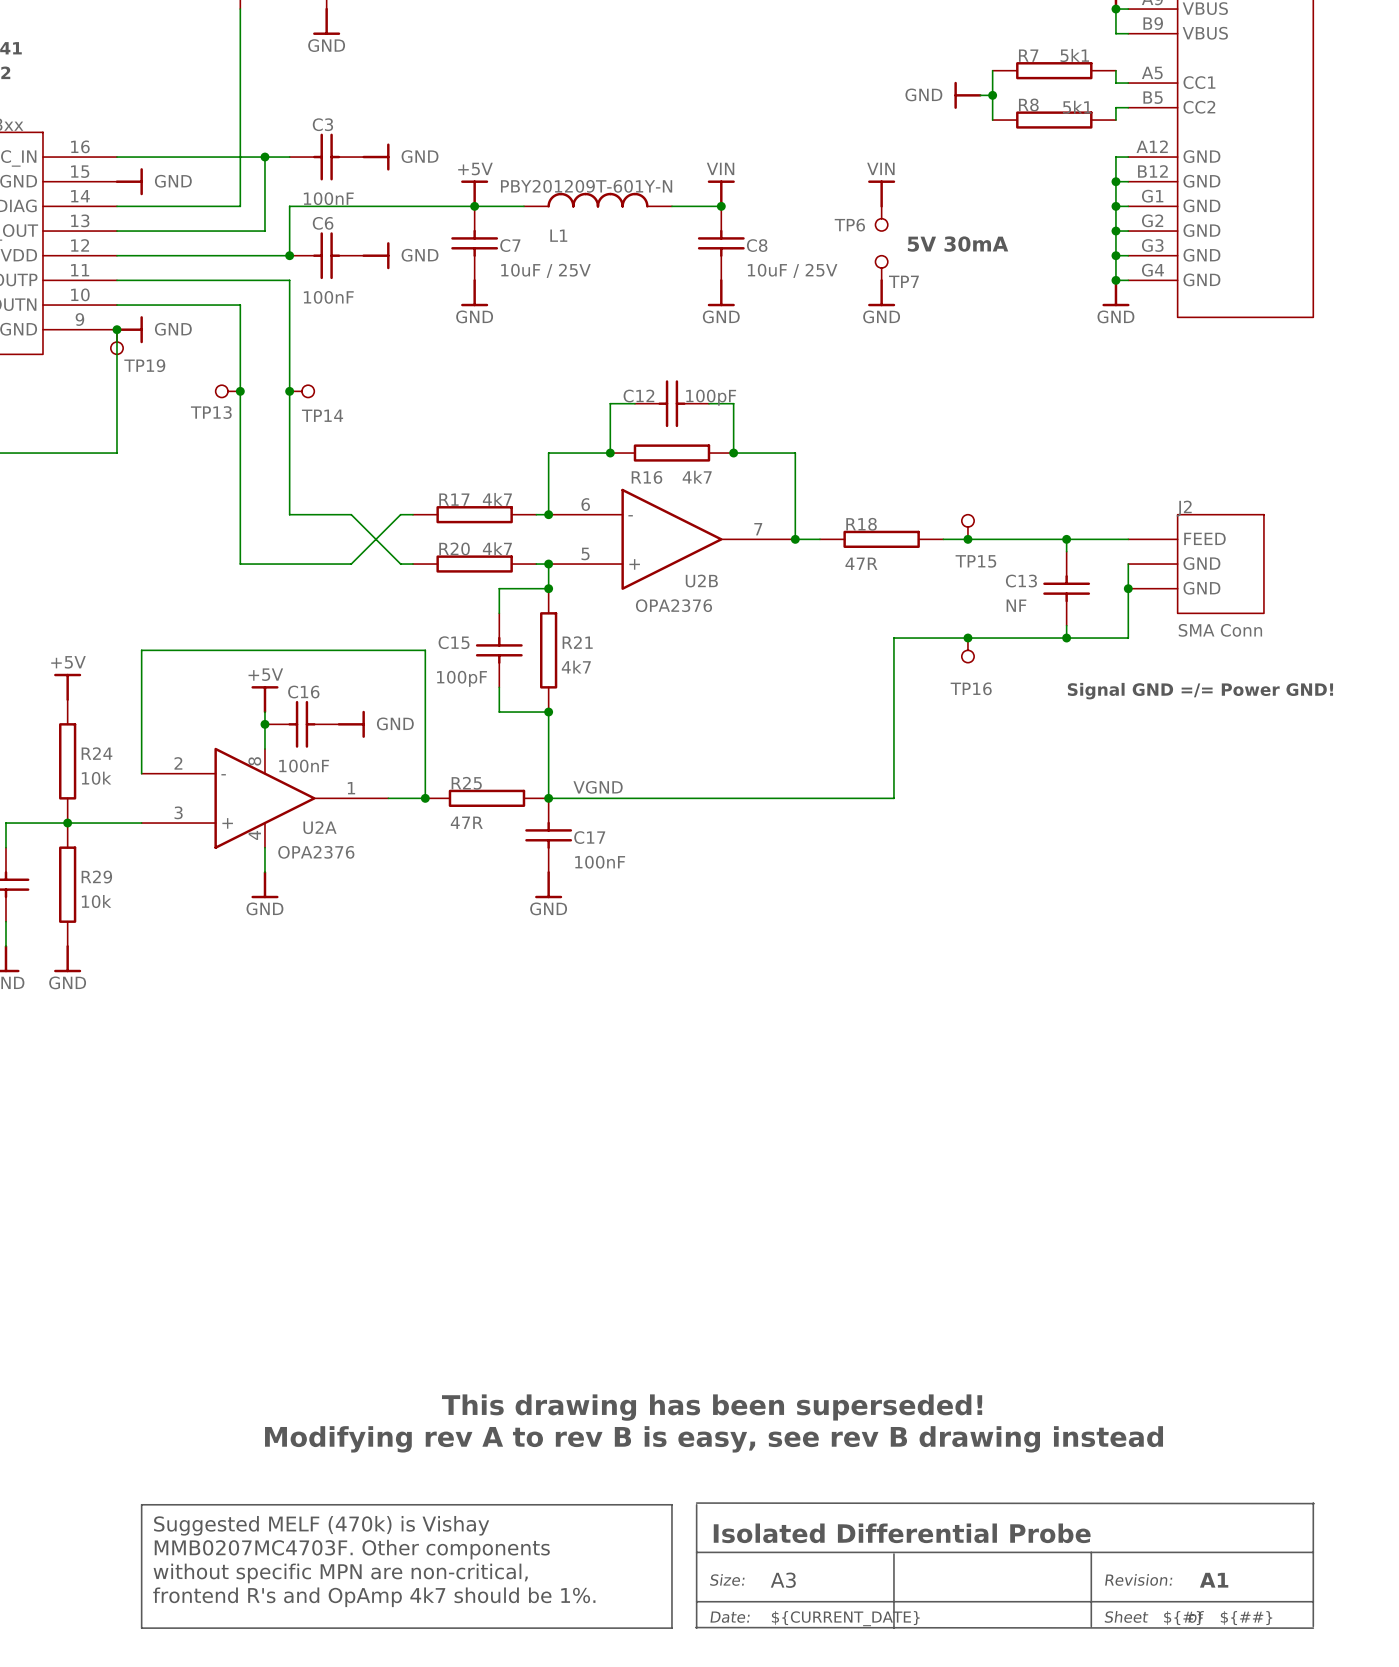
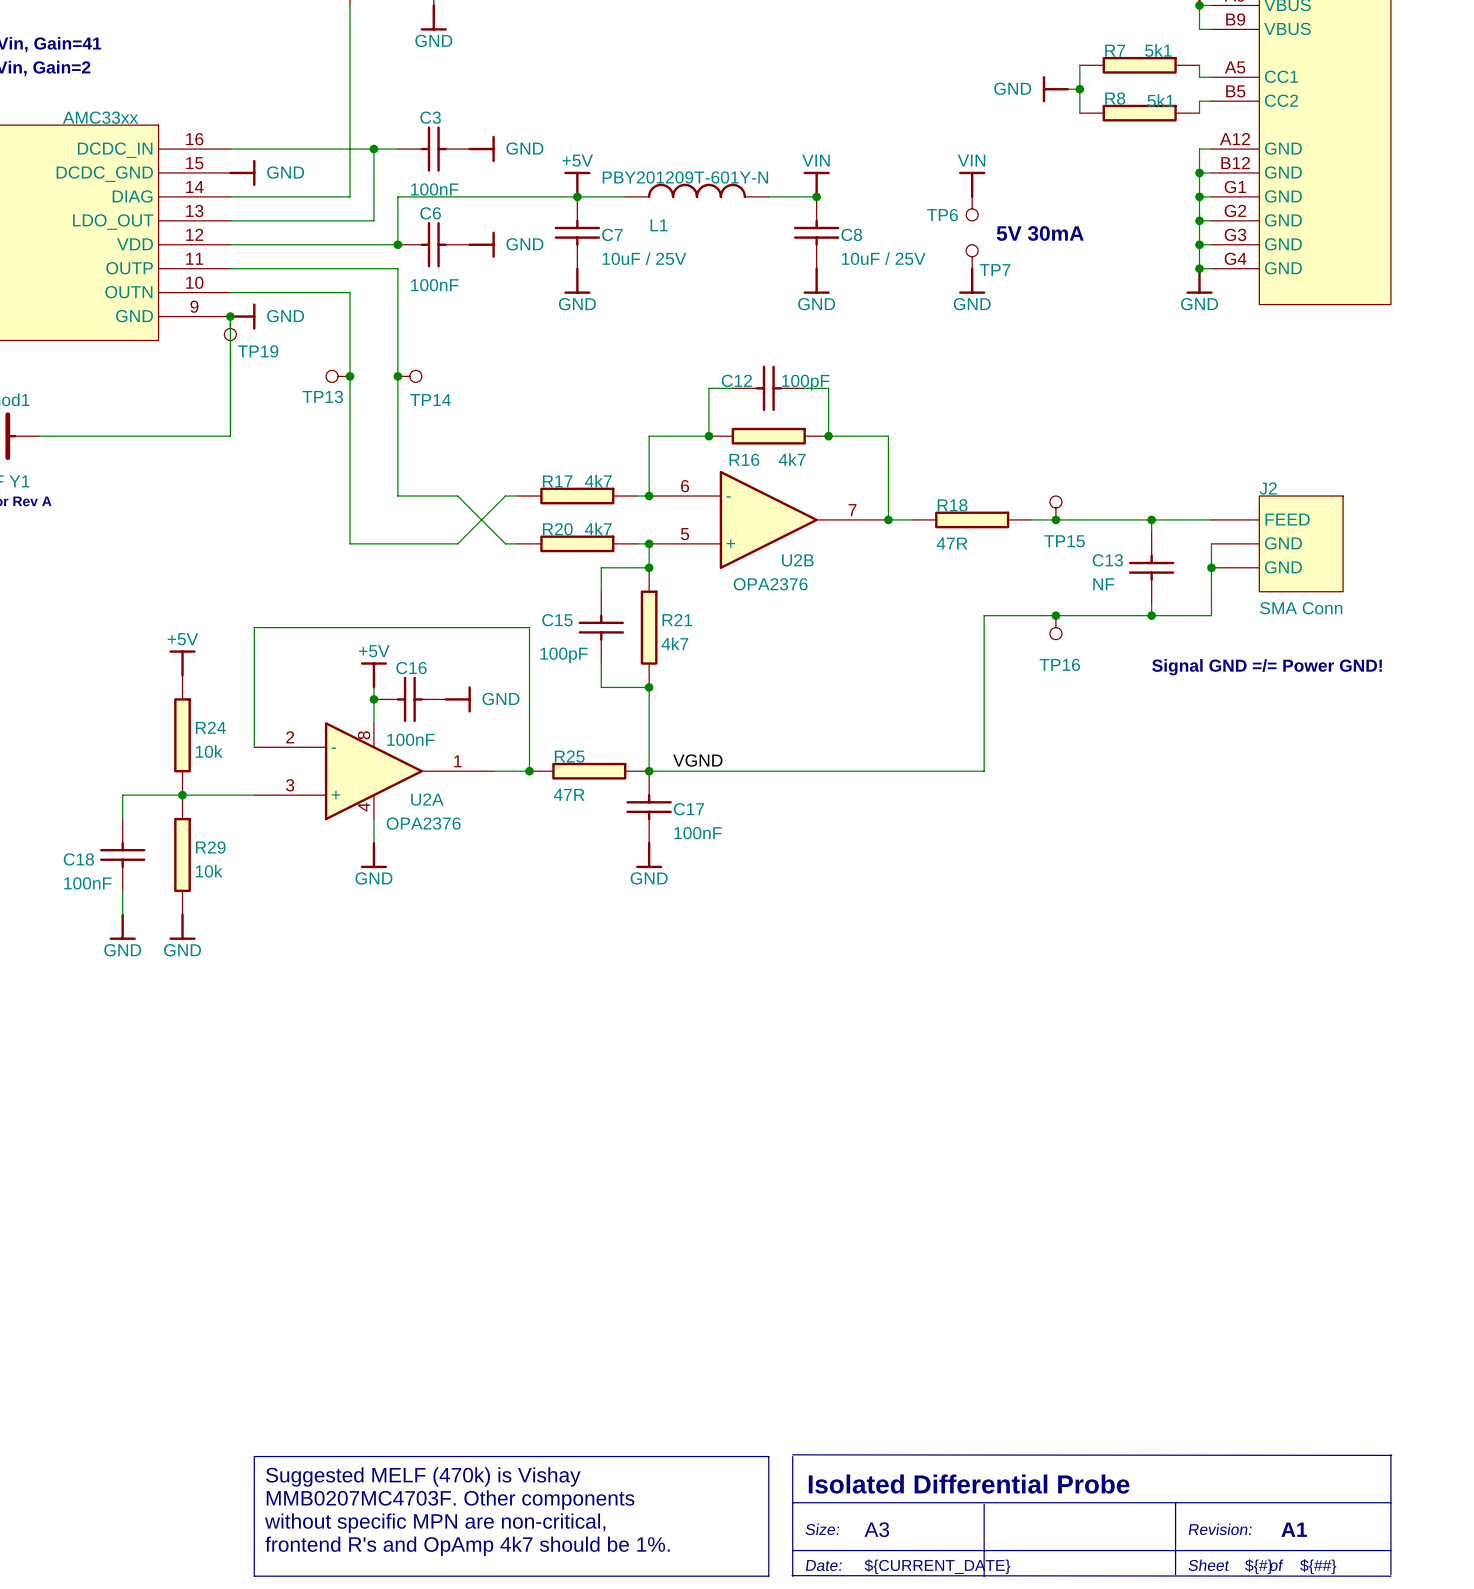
text: This drawing has been superseded! (712, 1407) -> none
text: Modifying rev A to rev B is easy, see rev B drawing instead (714, 1439) -> none

